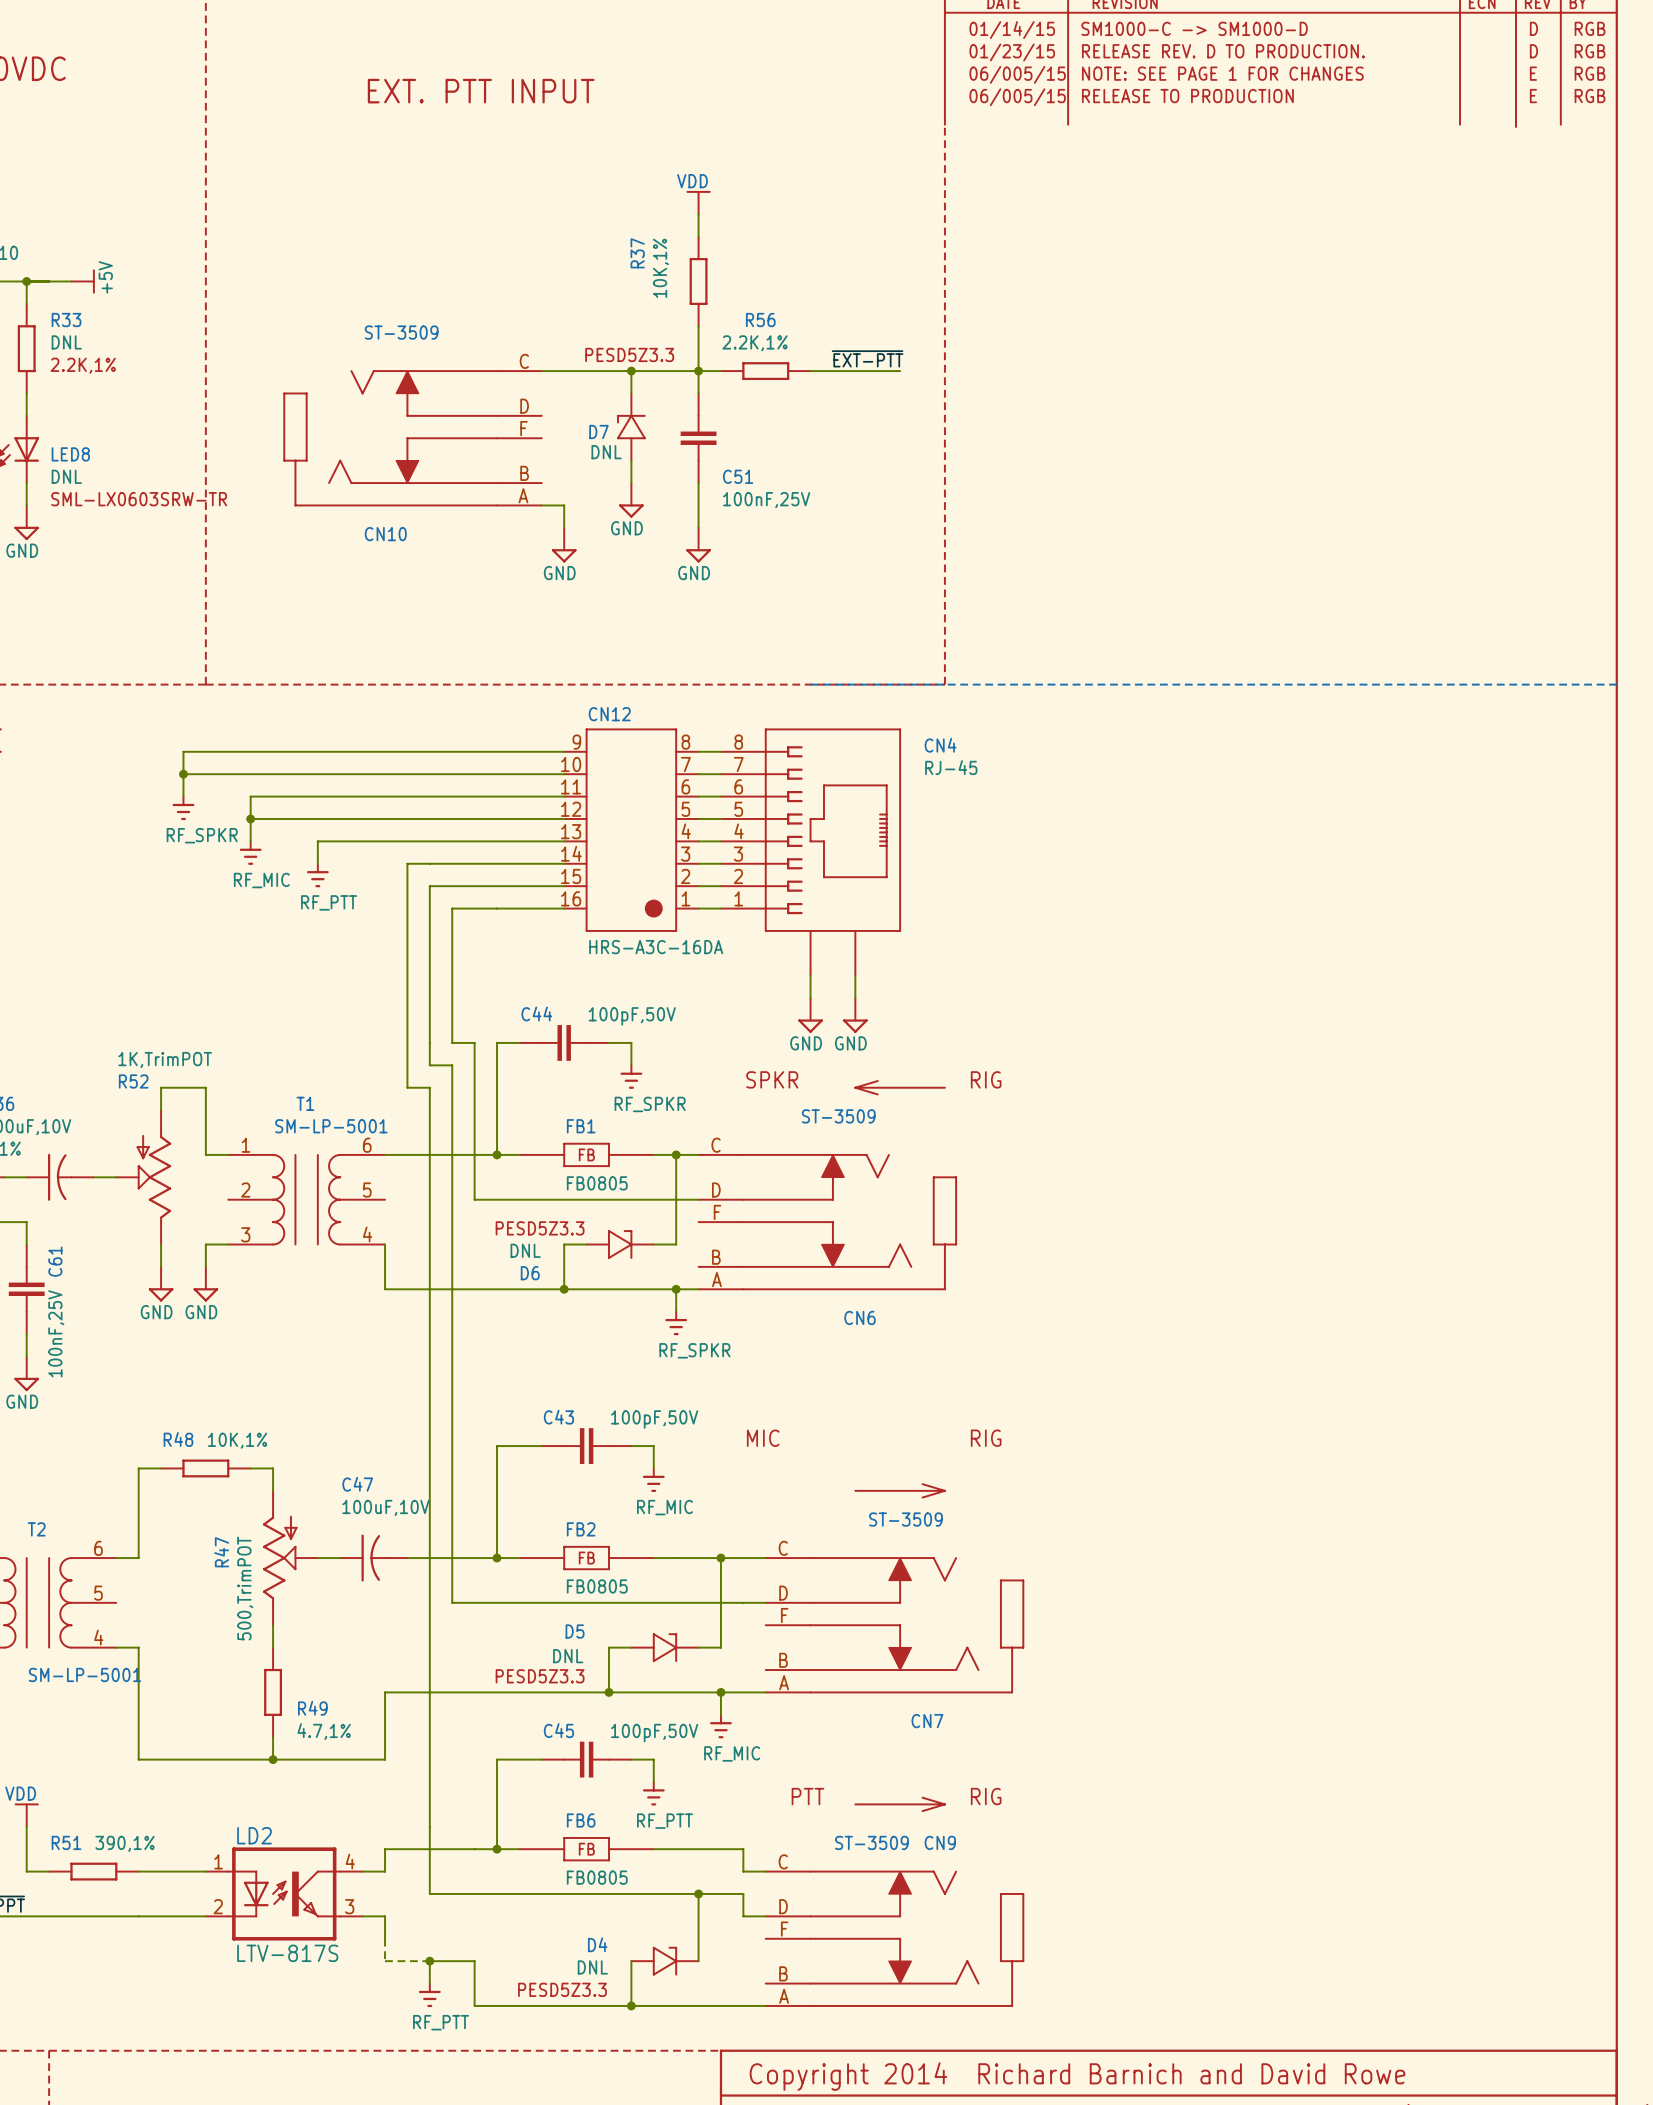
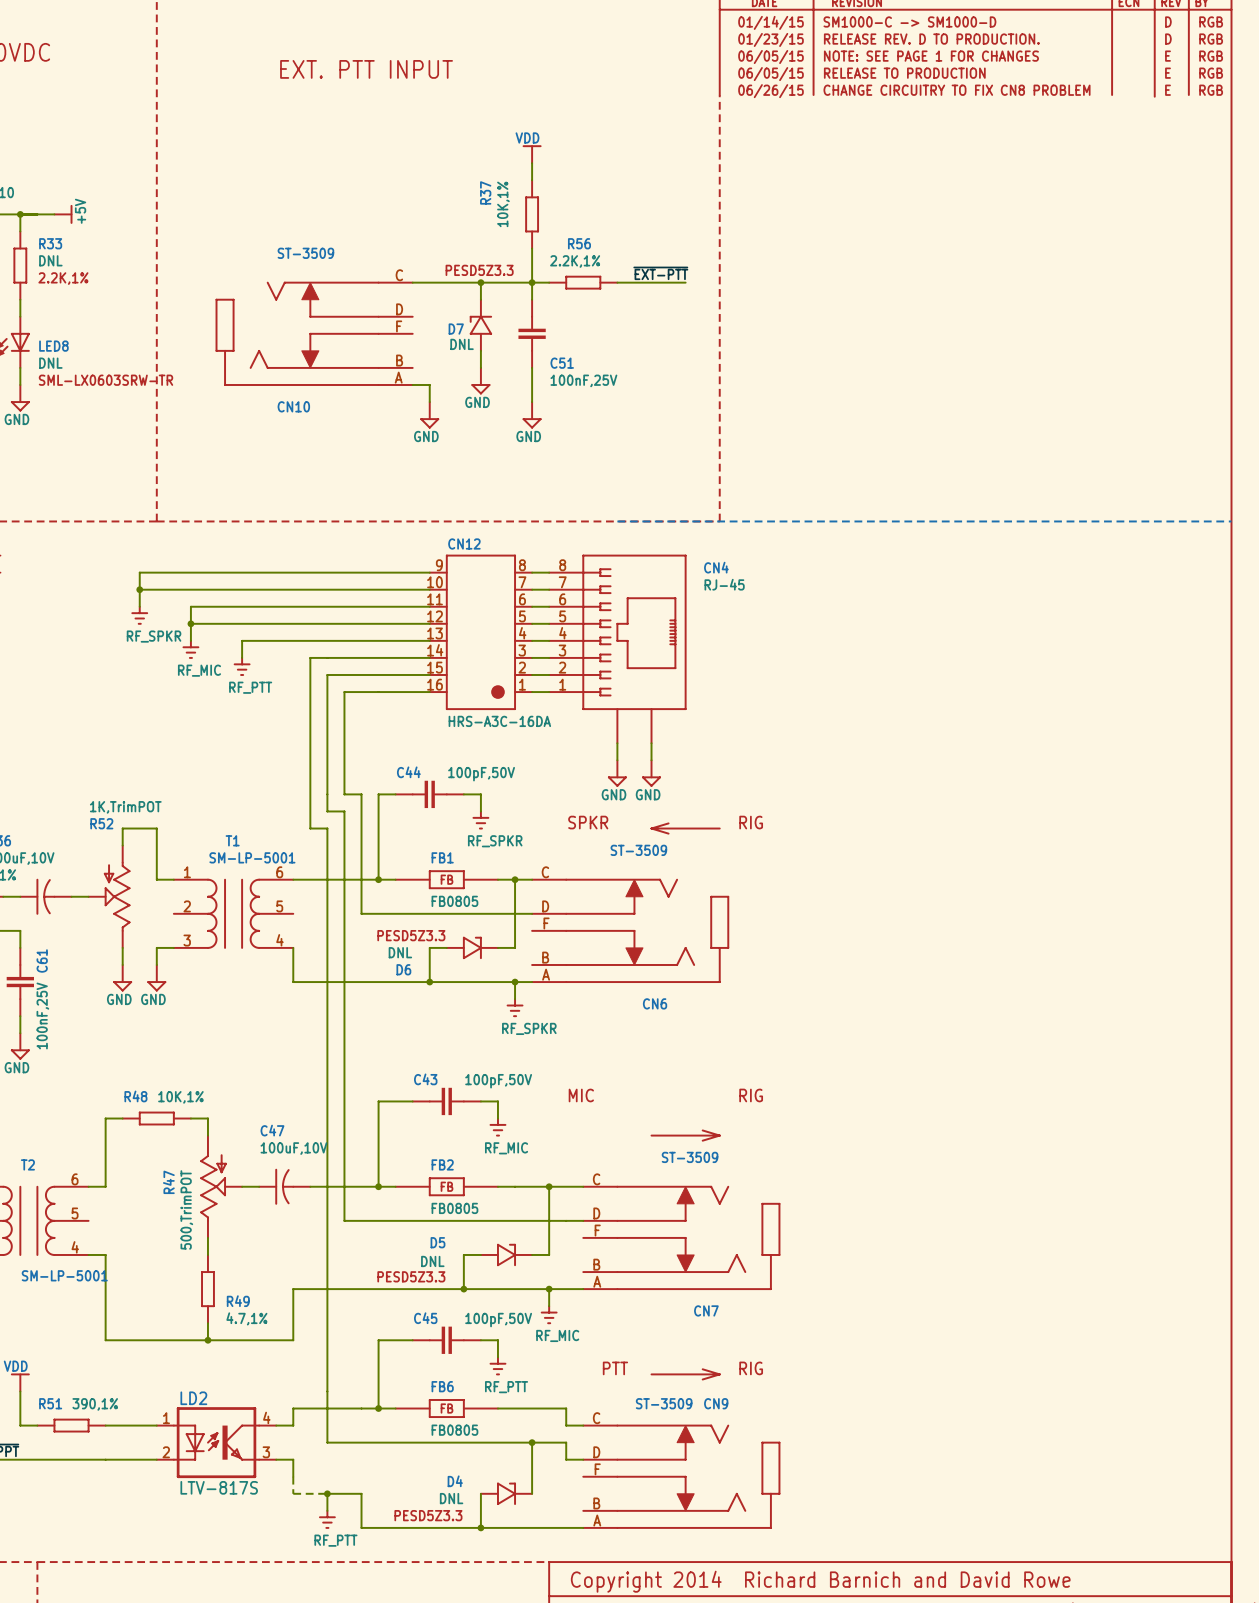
text: 06/005/15 (1017, 74) -> 06/05/15 (771, 57)
text: 06/005/15 (1017, 97) -> 06/05/15 (771, 74)
text: none -> CHANGE CIRCUITRY TO FIX CN8 PROBLEM (957, 90)
text: none -> E (1167, 90)
text: none -> RGB (1211, 90)
text: none -> 06/26/15 (771, 91)

